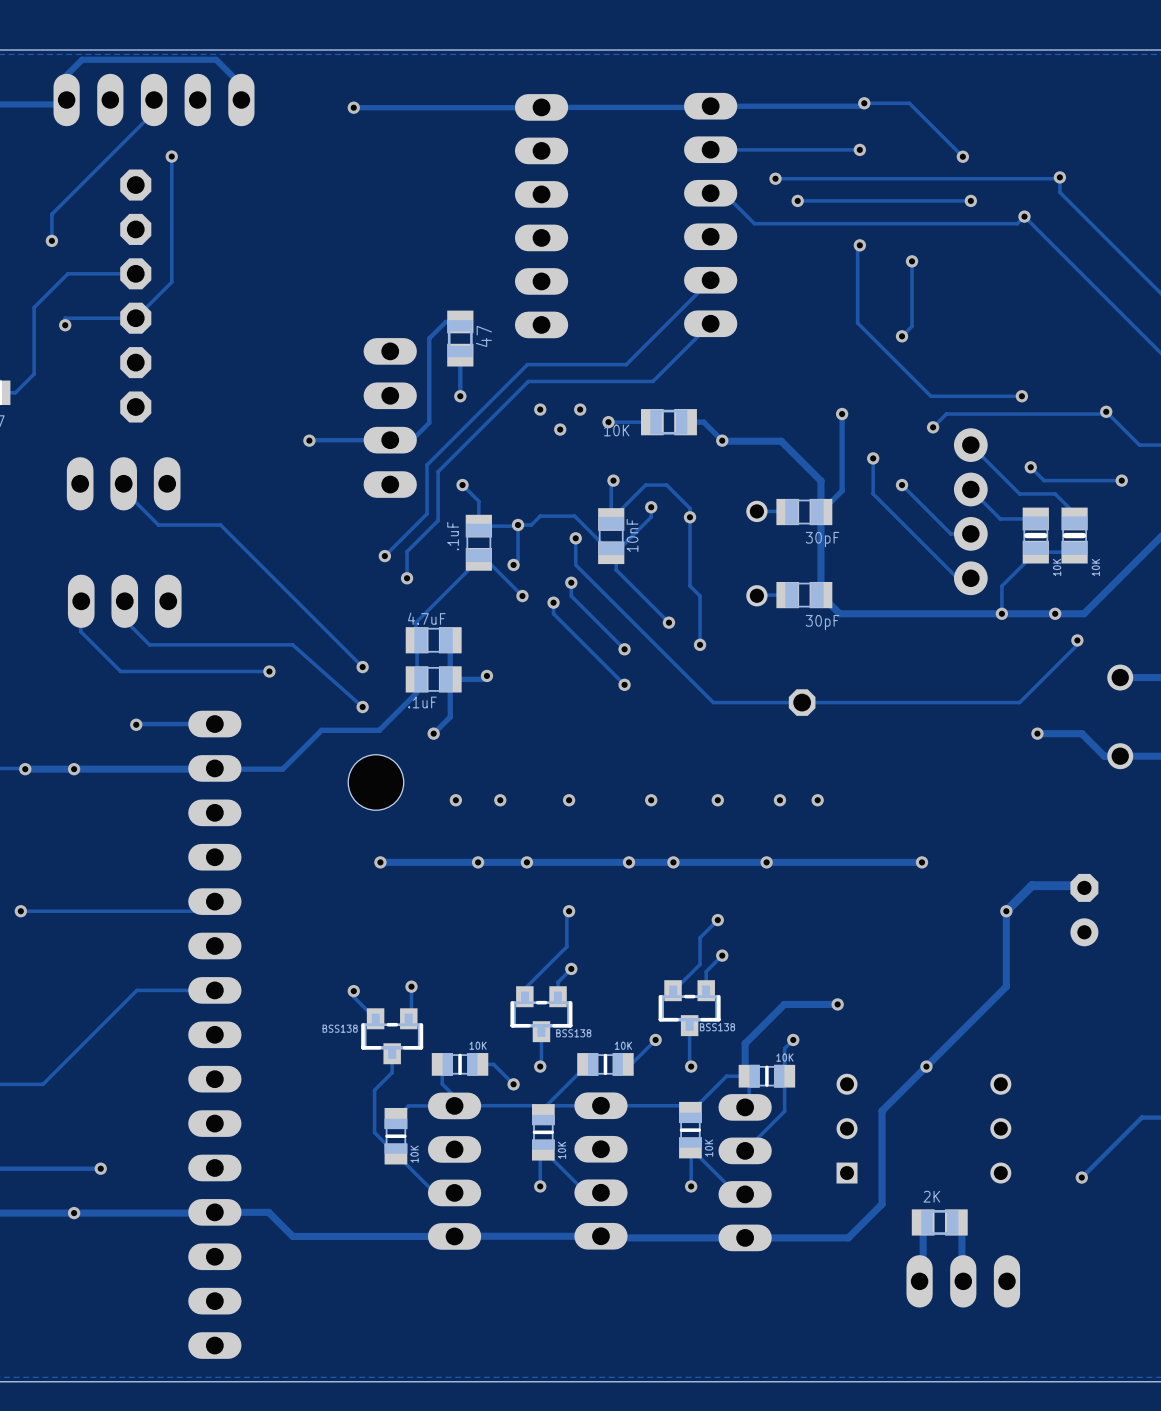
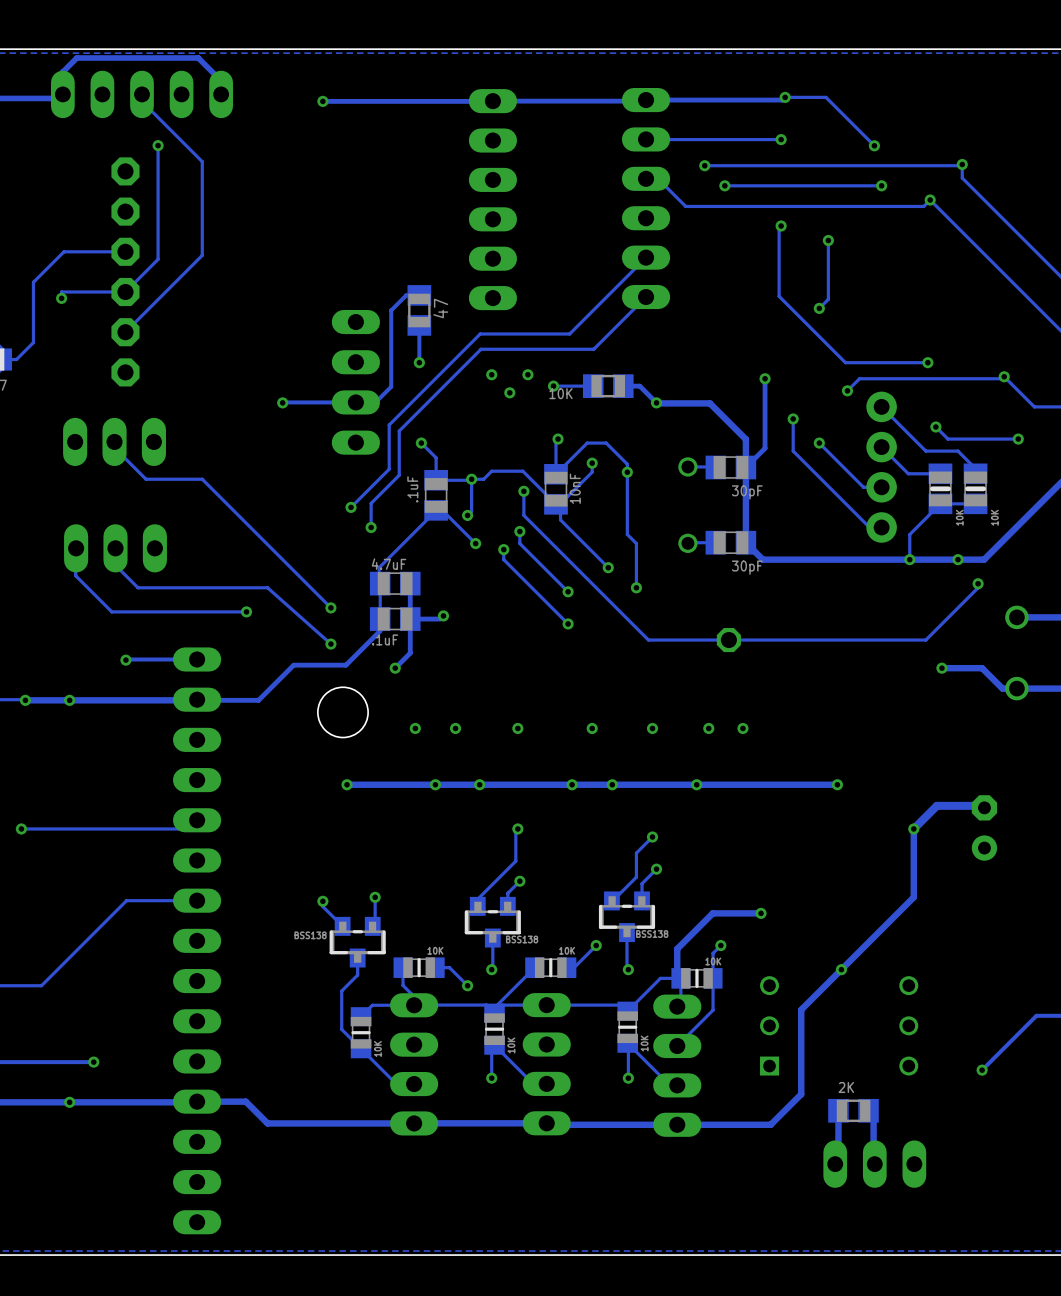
track: (154, 107) (154, 112) (51, 214) (51, 240) -> (142, 101) (202, 161) (202, 255) (125, 332)
via: (51, 240) -> none

